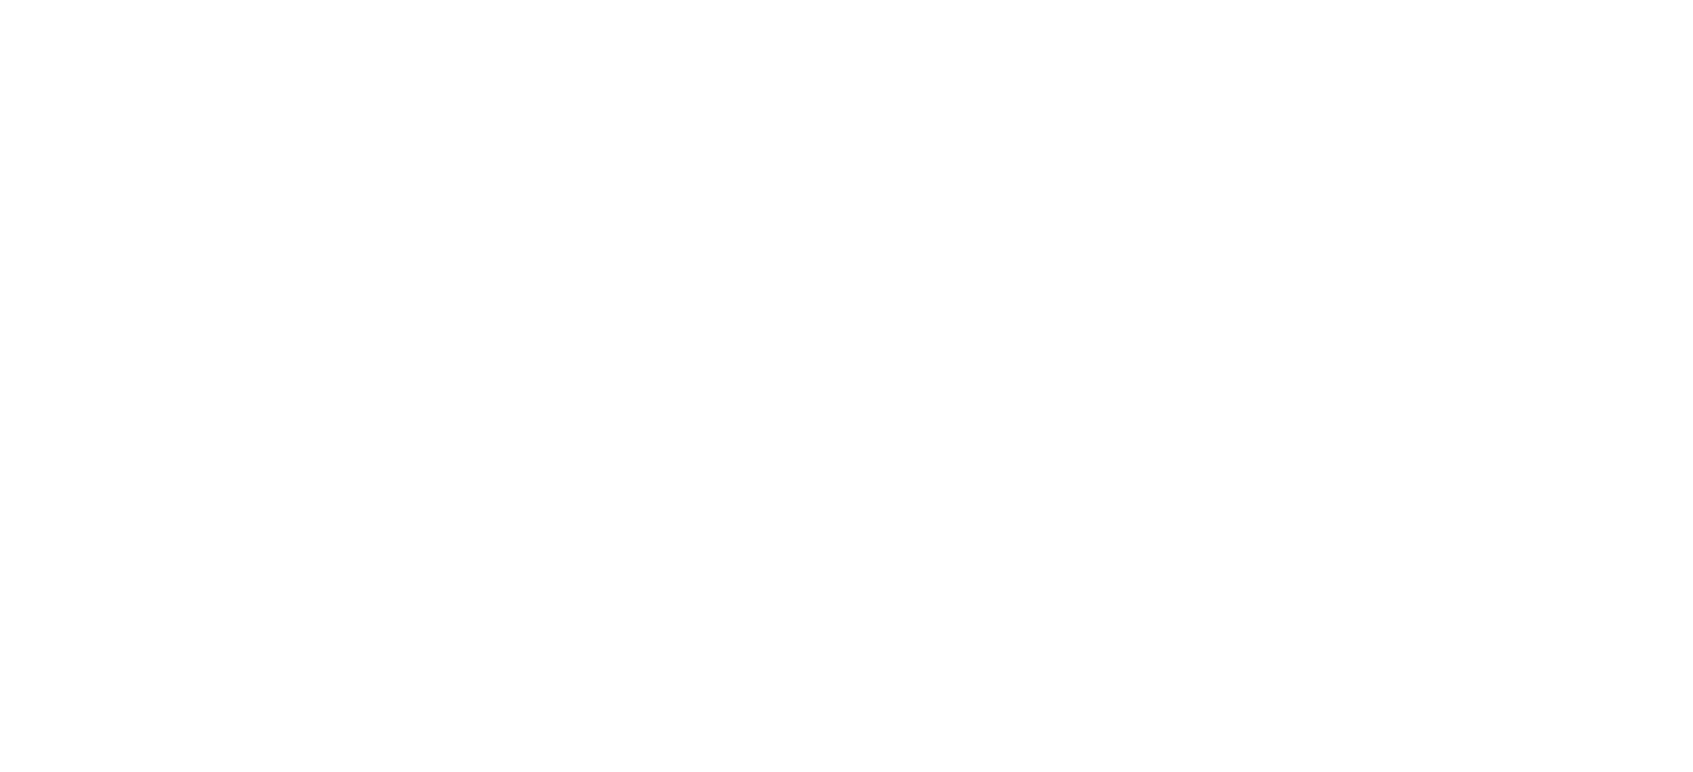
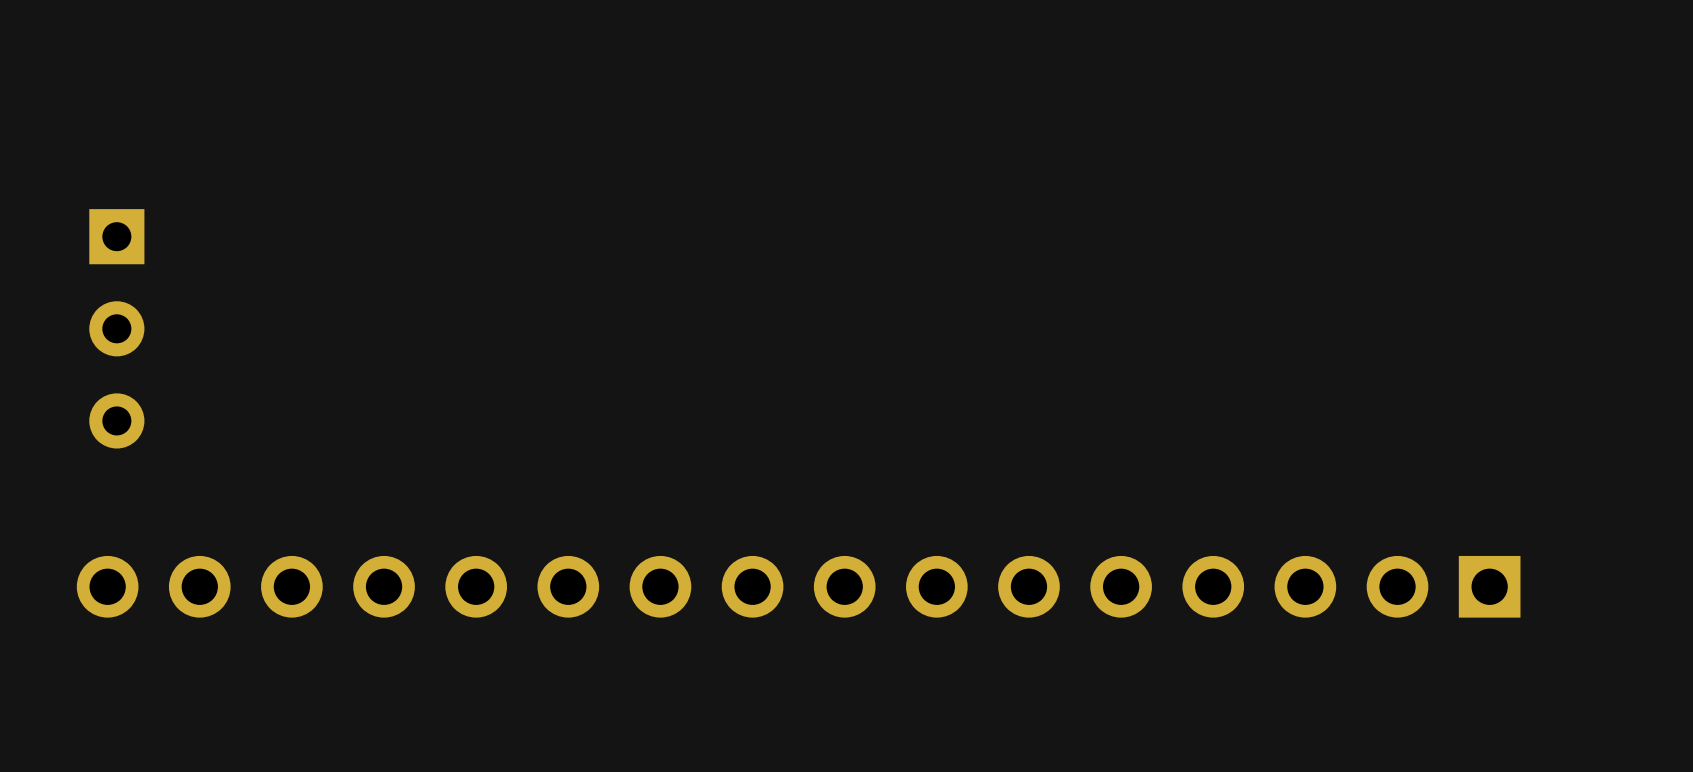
part: none -> (116, 328)
part: none -> (798, 586)

